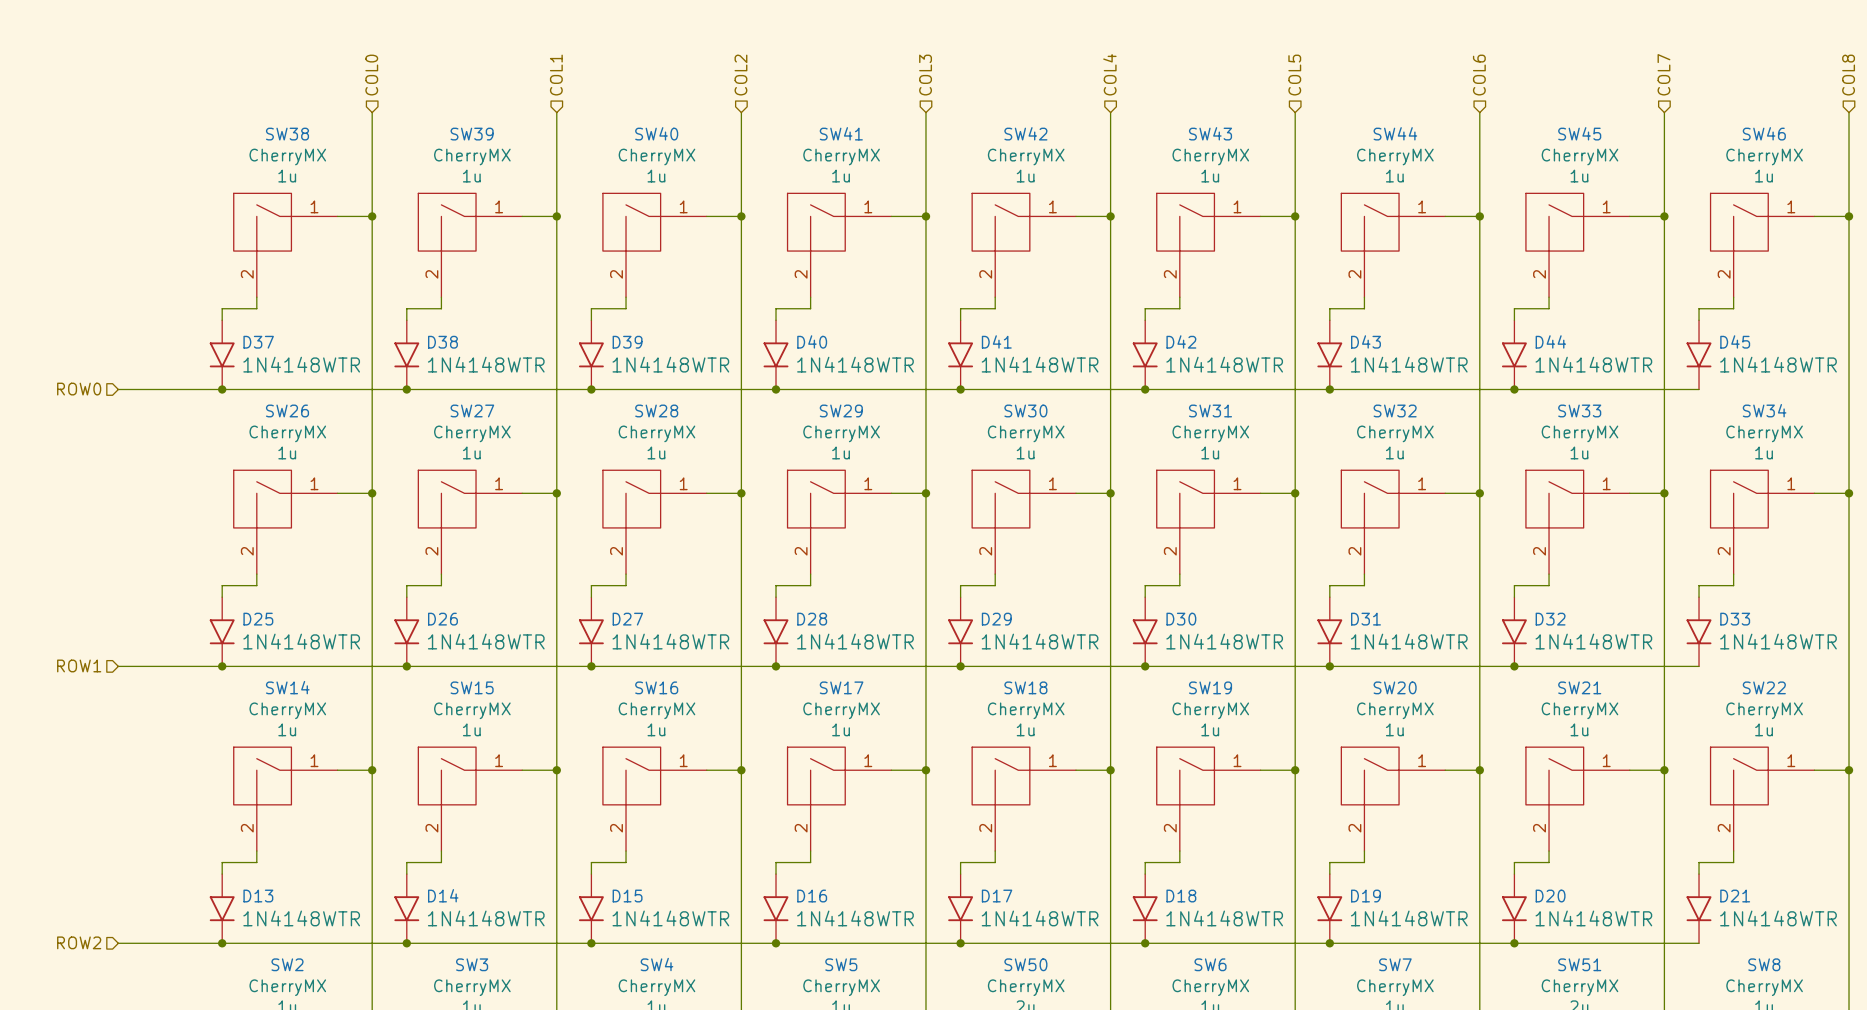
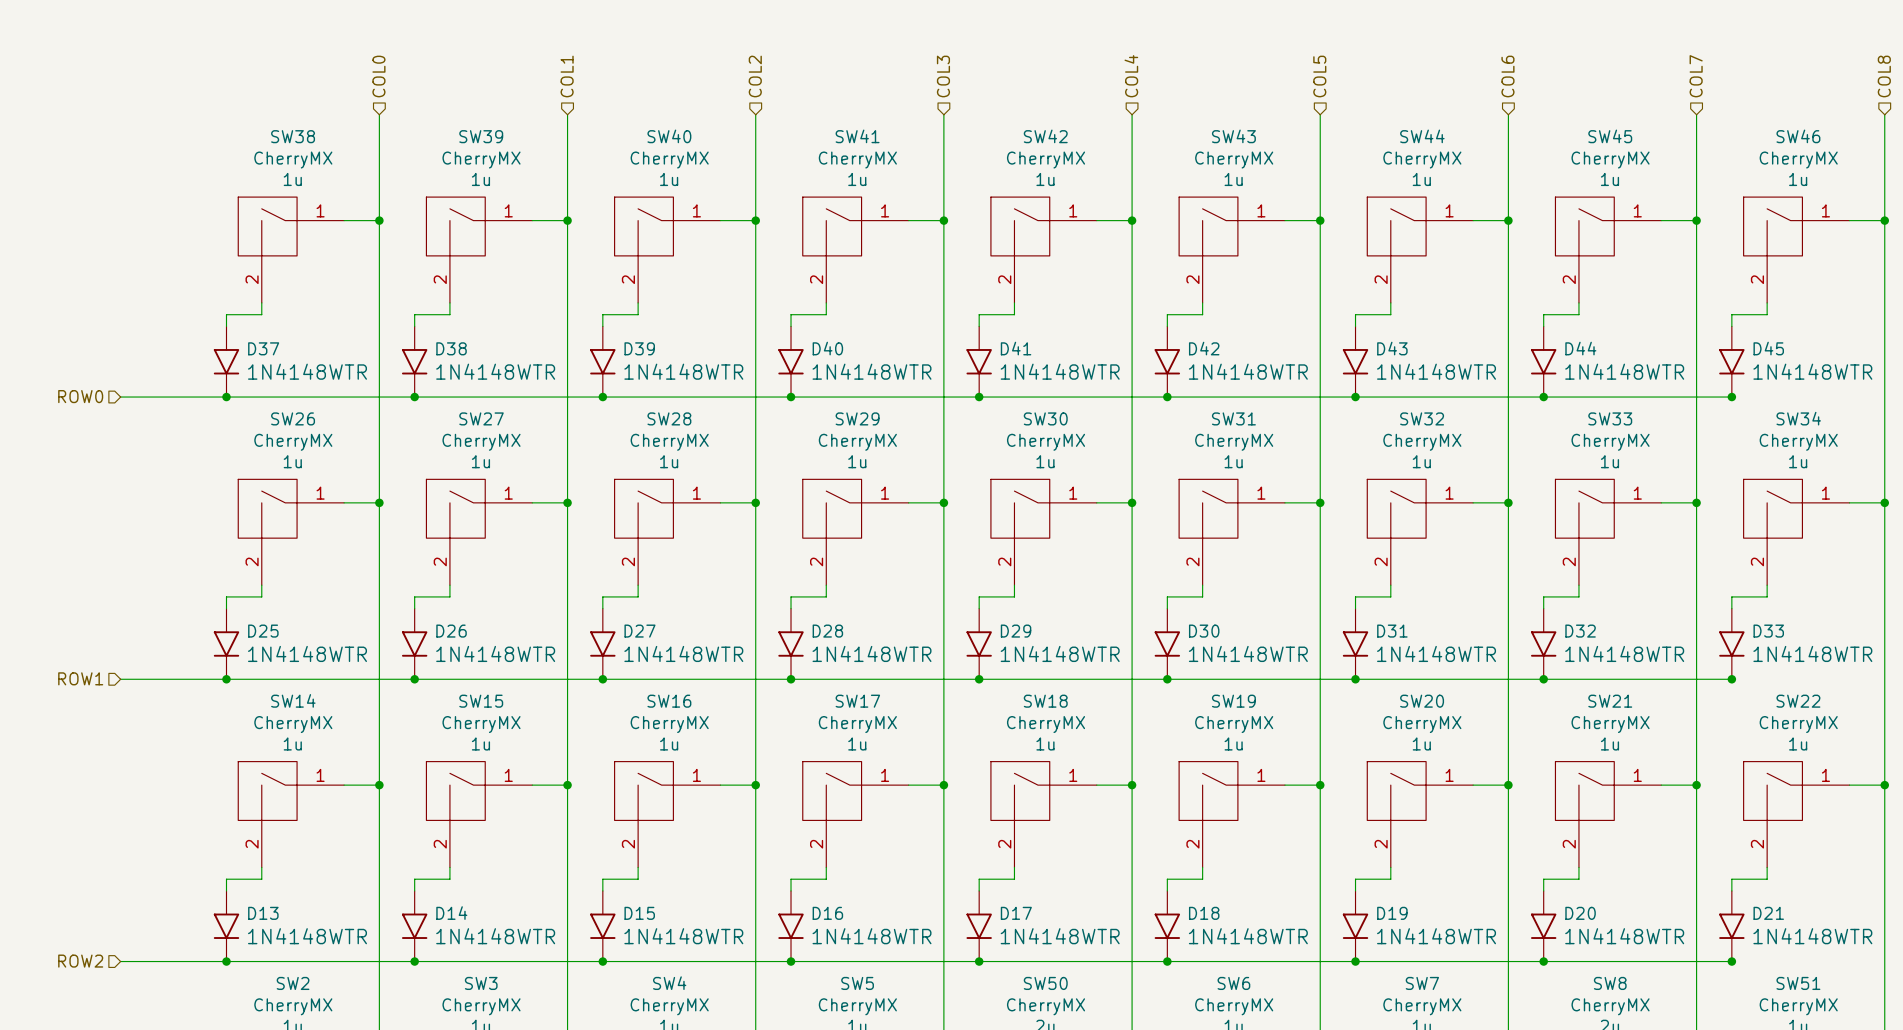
junction: none -> (1731, 397)
junction: none -> (1731, 679)
junction: none -> (1731, 961)
SW51 name: SW51 (1579, 964) -> SW8 (1610, 983)
SW8 name: SW8 (1764, 964) -> SW51 (1798, 983)

